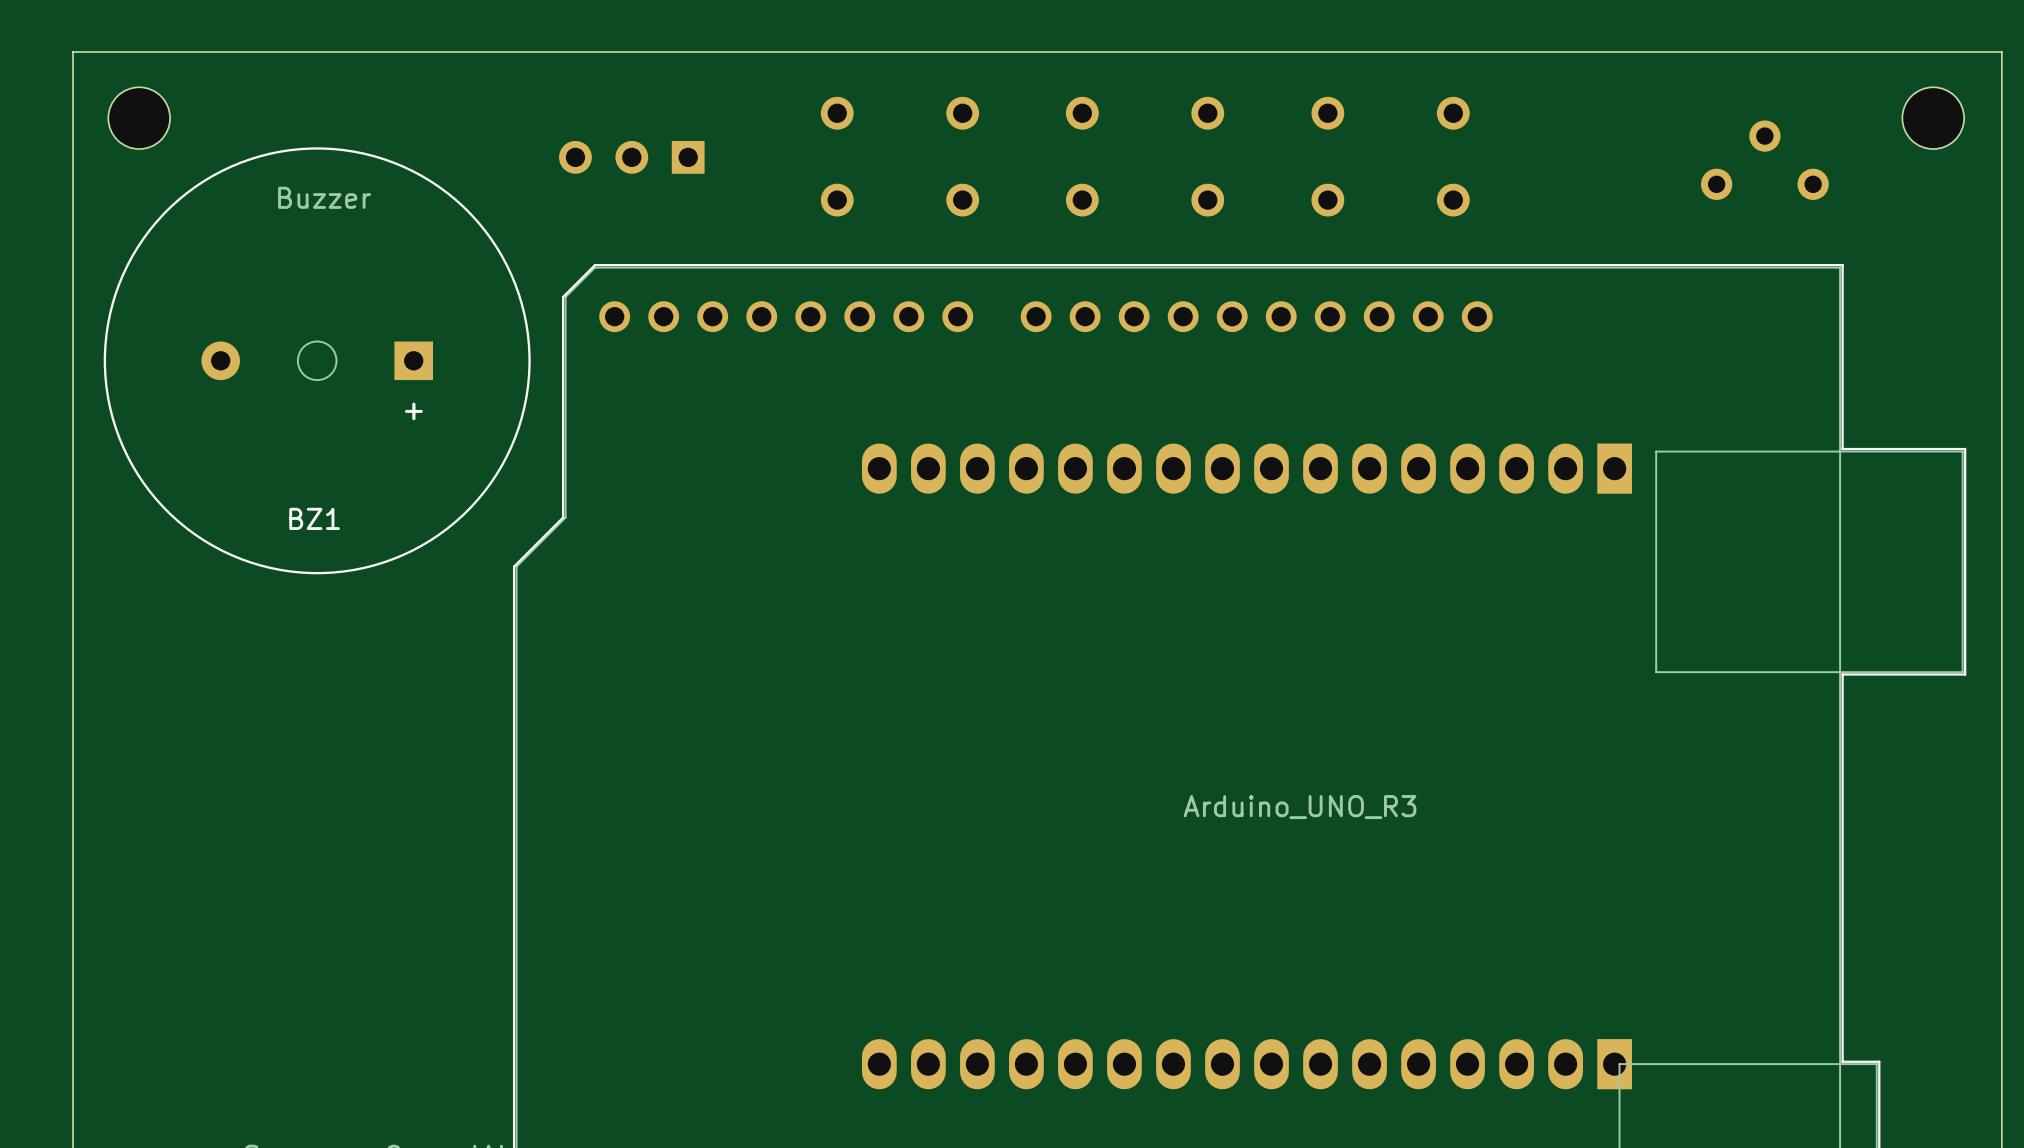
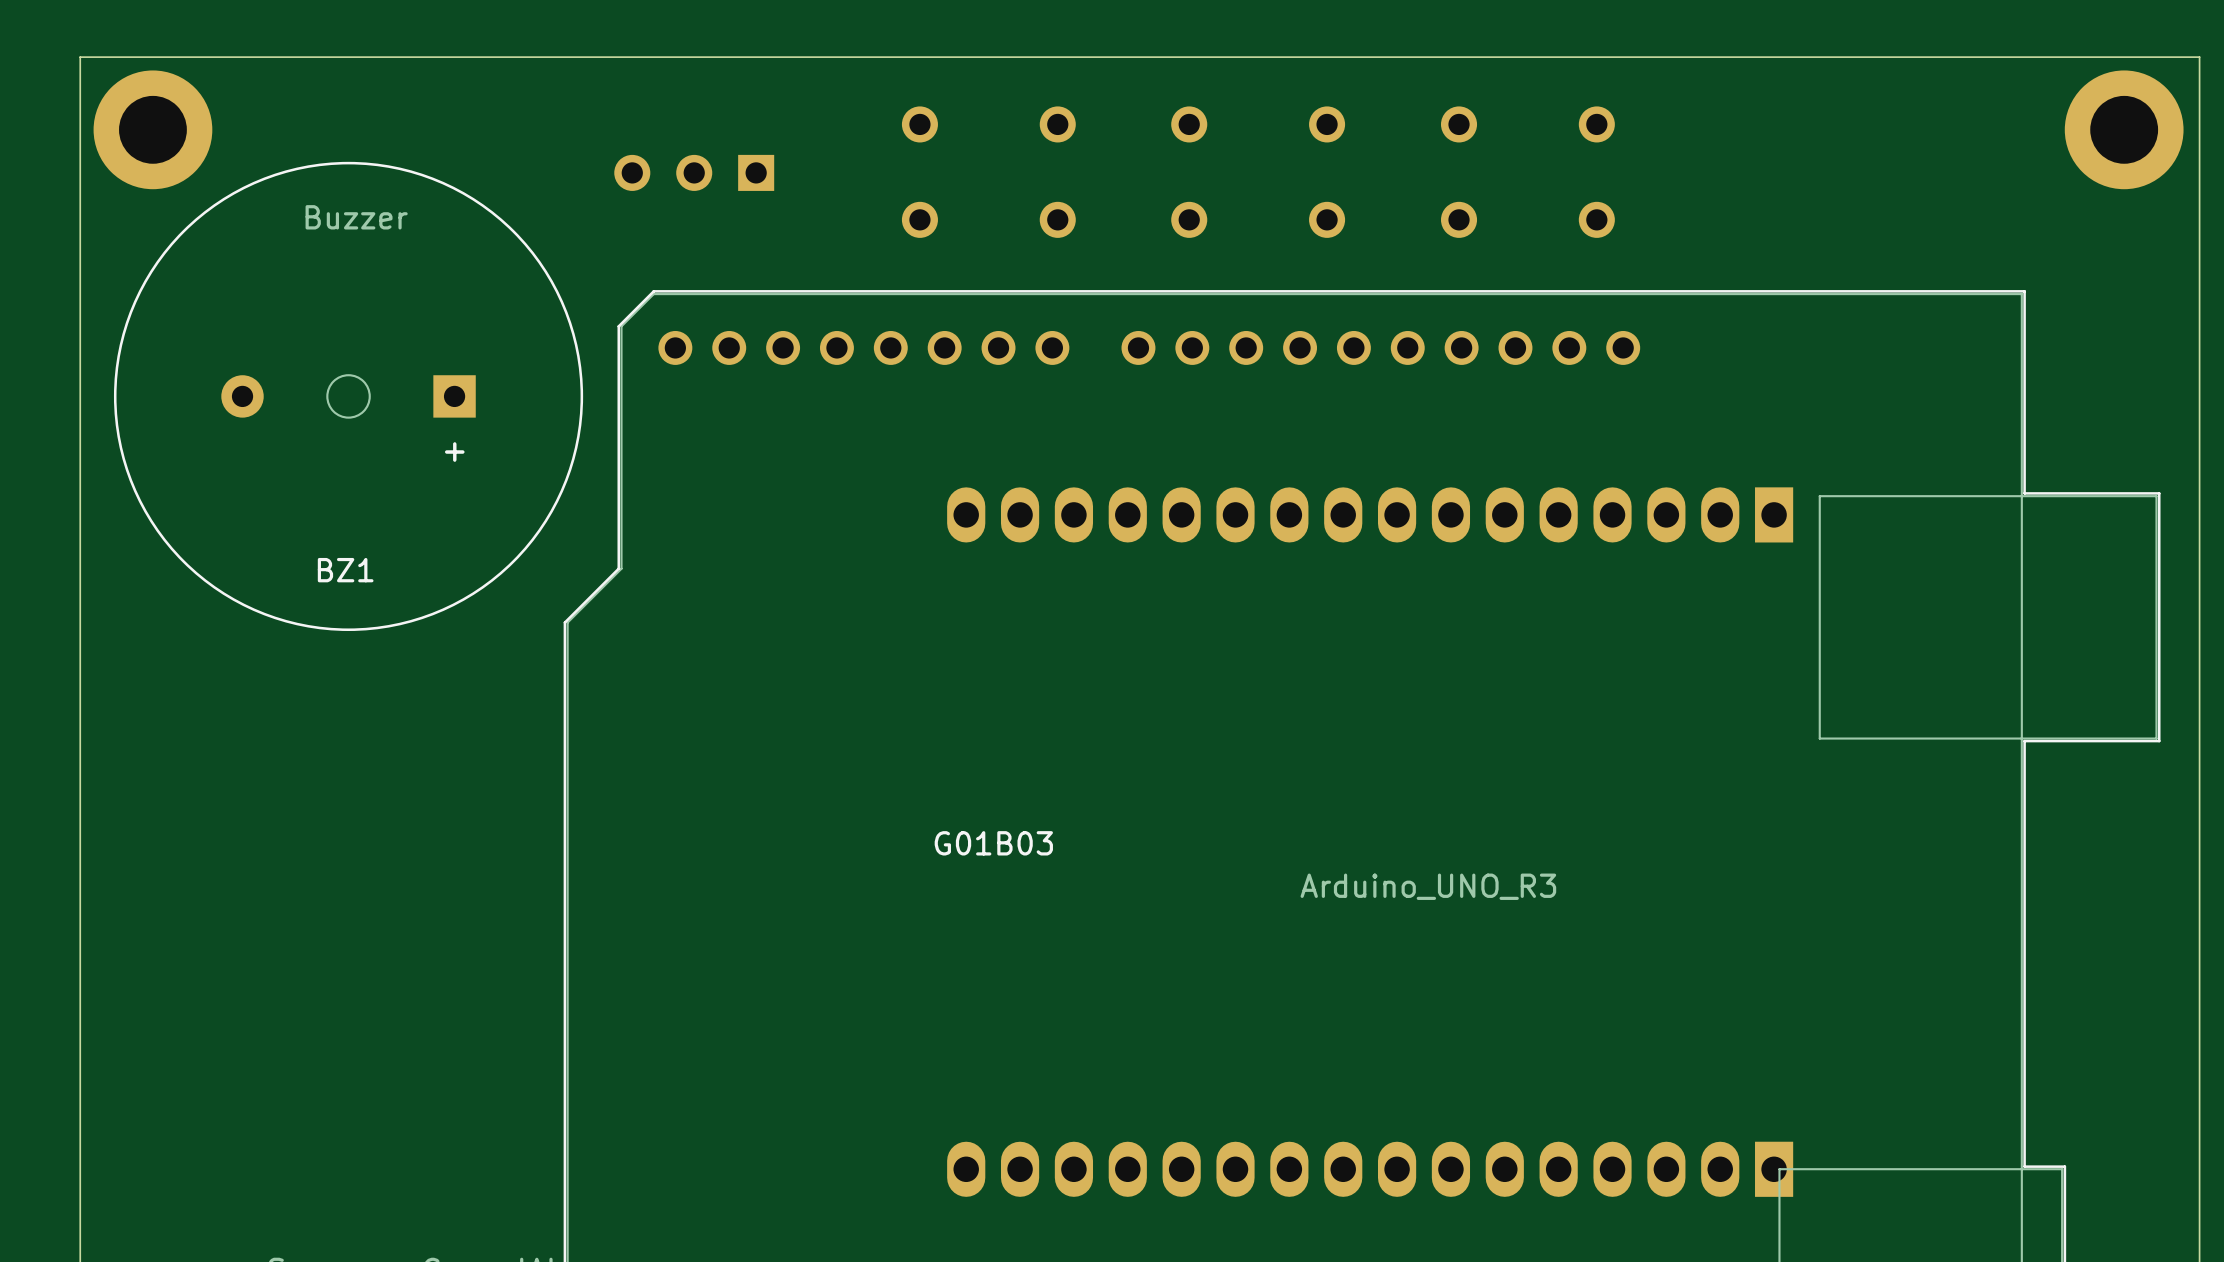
part footprint: [108, 87, 171, 150] -> [93, 70, 213, 190]
part footprint: [1902, 87, 1965, 150] -> [2064, 70, 2184, 190]
part: (1764, 160) -> none
text: none -> G01B03 (993, 843)

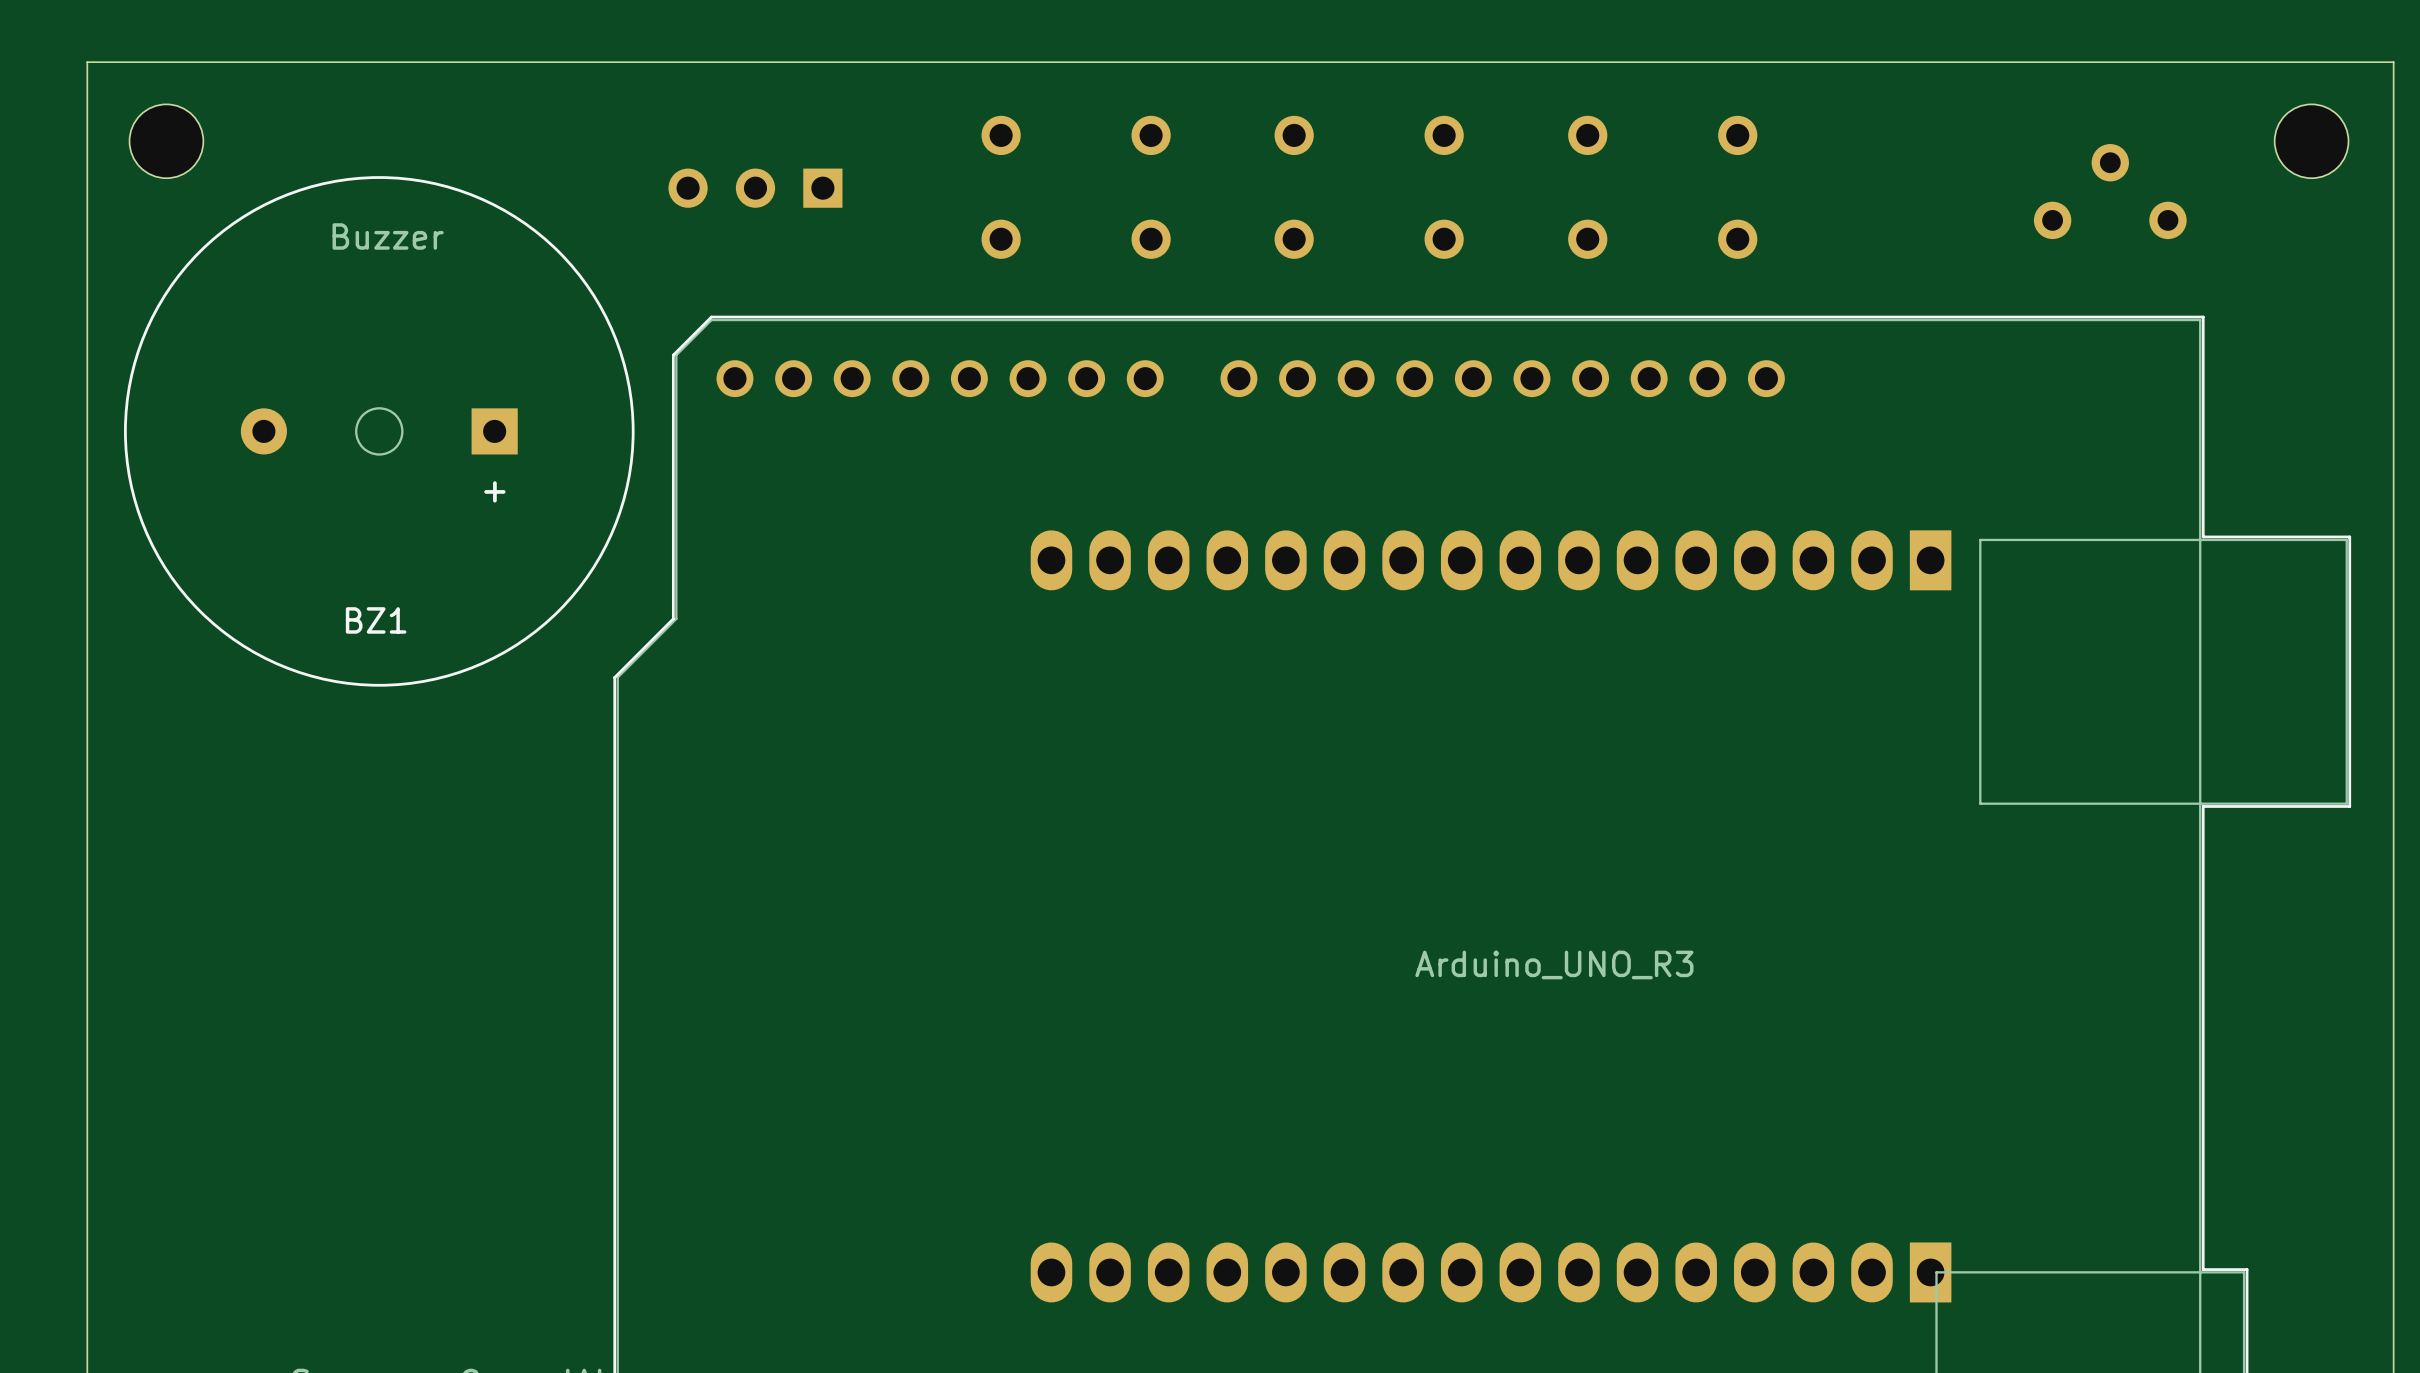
part footprint: [93, 70, 213, 190] -> [129, 104, 204, 179]
part footprint: [2064, 70, 2184, 190] -> [2274, 104, 2349, 179]
part: none -> (2110, 191)
text: G01B03 (993, 843) -> none

